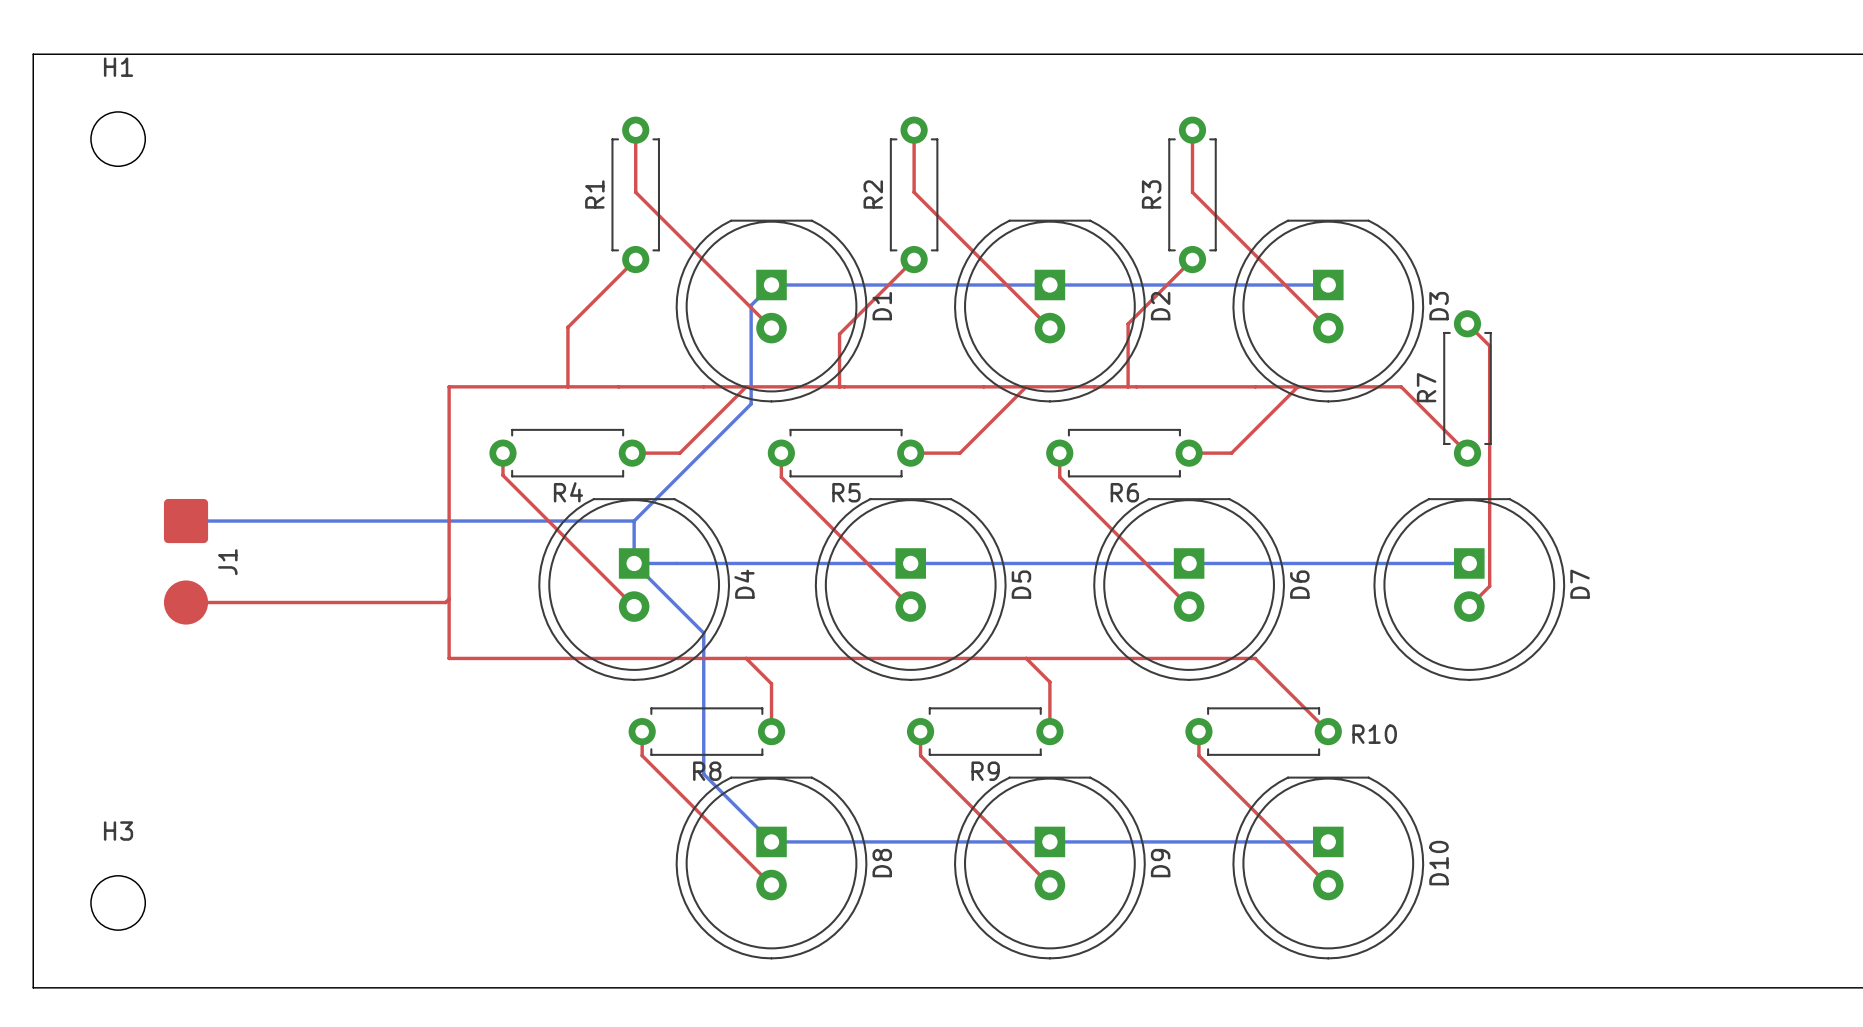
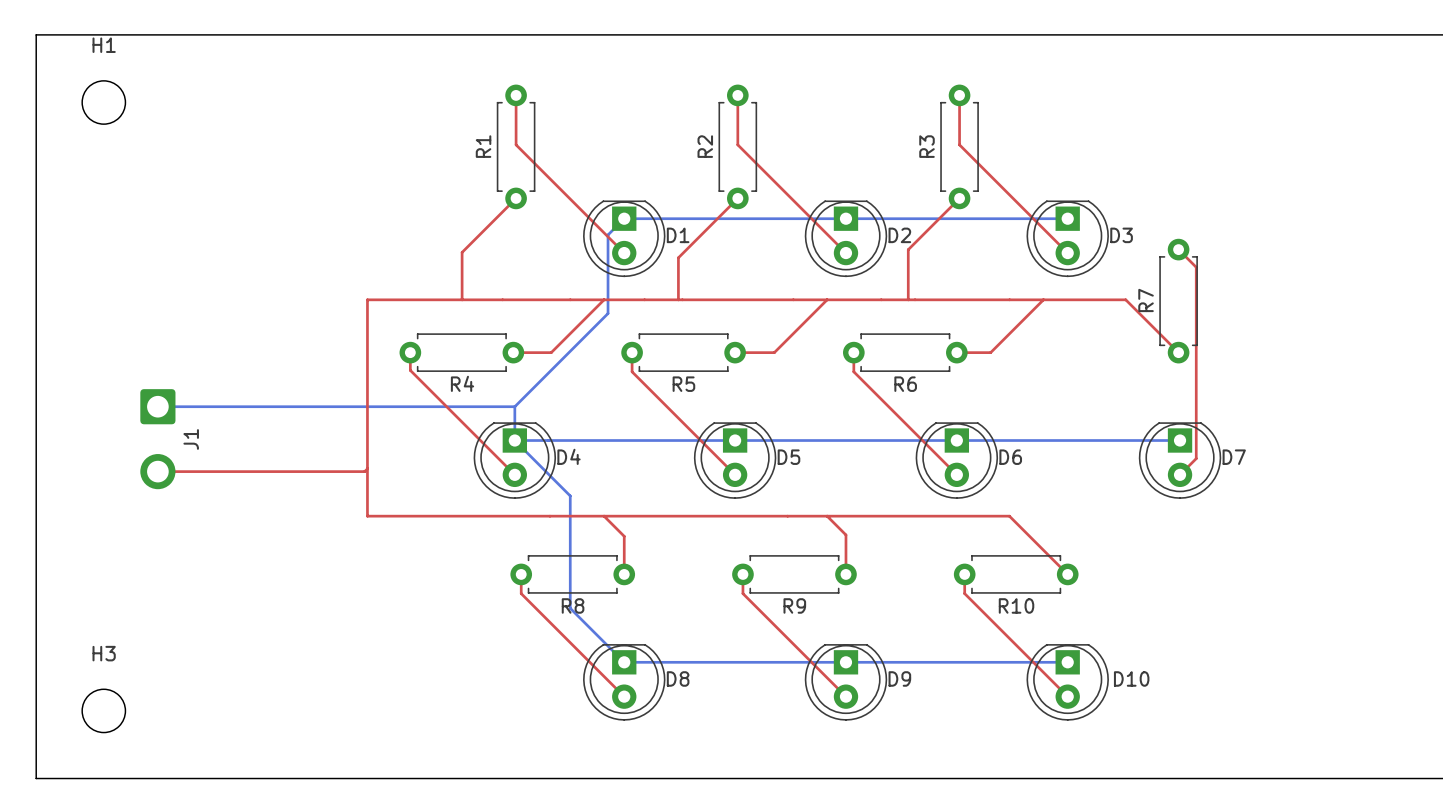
D1 footprint: [675, 219, 868, 403] -> [583, 200, 666, 278]
D2 footprint: [954, 219, 1146, 403] -> [804, 200, 888, 278]
D3 footprint: [1232, 219, 1425, 403] -> [1026, 200, 1109, 278]
D1 name position: D1 (882, 306) -> D1 (678, 235)
D2 name position: D2 (1160, 306) -> D2 (899, 235)
D3 name position: D3 (1439, 306) -> D3 (1121, 235)
J1 footprint: [163, 498, 209, 625] -> [140, 389, 176, 490]
D4 footprint: [538, 498, 731, 681] -> [473, 422, 557, 499]
D5 footprint: [814, 498, 1007, 681] -> [693, 422, 777, 499]
D6 footprint: [1093, 498, 1286, 681] -> [915, 422, 999, 499]
D7 footprint: [1373, 498, 1566, 681] -> [1138, 422, 1222, 499]
D4 name position: D4 (744, 584) -> D4 (569, 456)
D5 name position: D5 (1021, 584) -> D5 (788, 457)
D6 name position: D6 (1299, 584) -> D6 (1010, 457)
D7 name position: D7 (1580, 584) -> D7 (1234, 457)
R10 name position: R10 (1374, 734) -> R10 (1016, 605)
D8 footprint: [675, 776, 868, 960] -> [583, 644, 666, 721]
D9 footprint: [954, 776, 1146, 960] -> [804, 644, 888, 721]
D10 footprint: [1232, 776, 1425, 960] -> [1026, 644, 1109, 721]
D8 name position: D8 (882, 863) -> D8 (678, 678)
D9 name position: D9 (1160, 863) -> D9 (899, 678)

